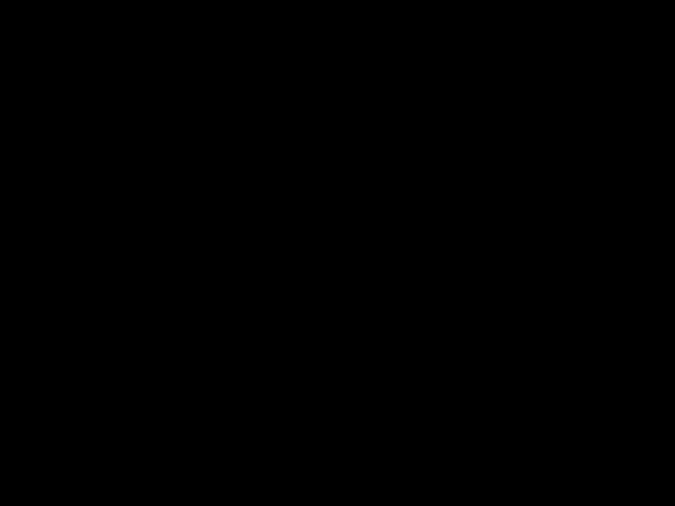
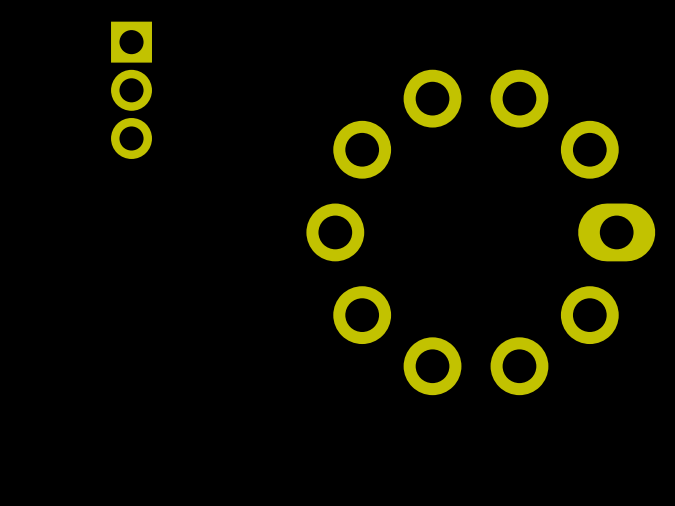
part: none -> (131, 90)
part: none -> (480, 232)

